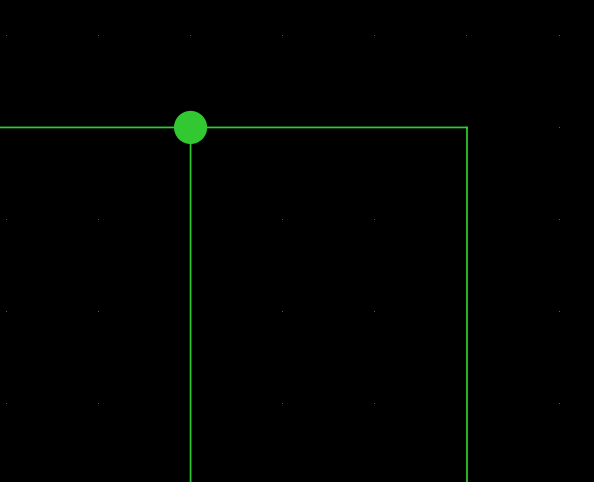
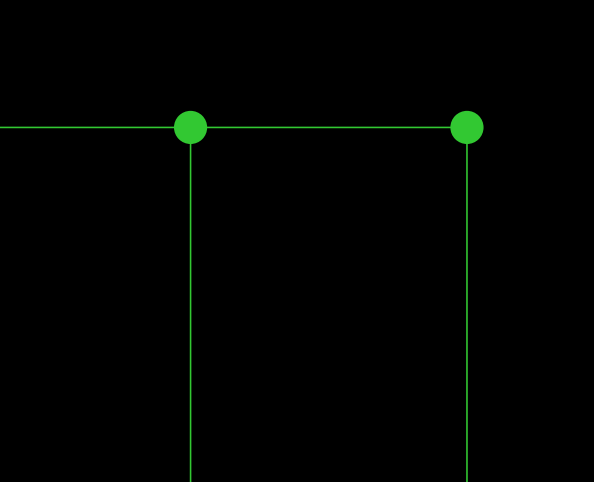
junction: none -> (466, 127)

